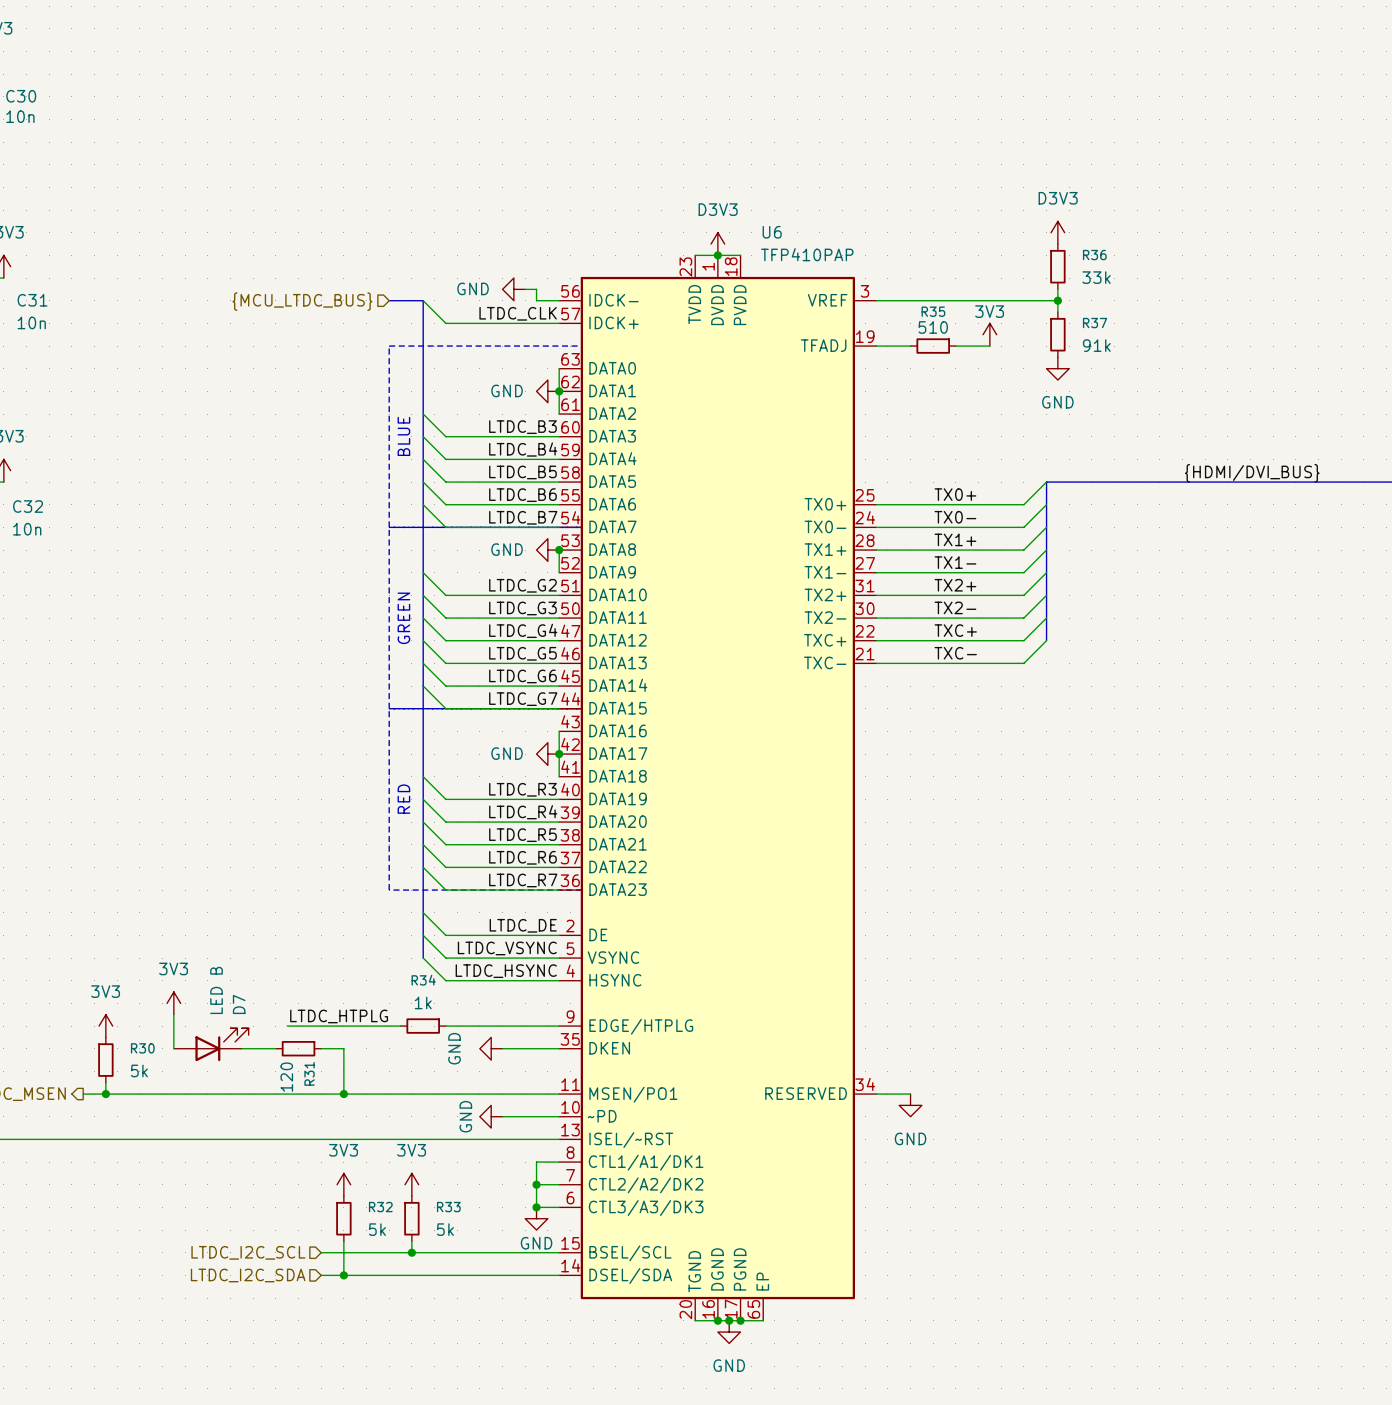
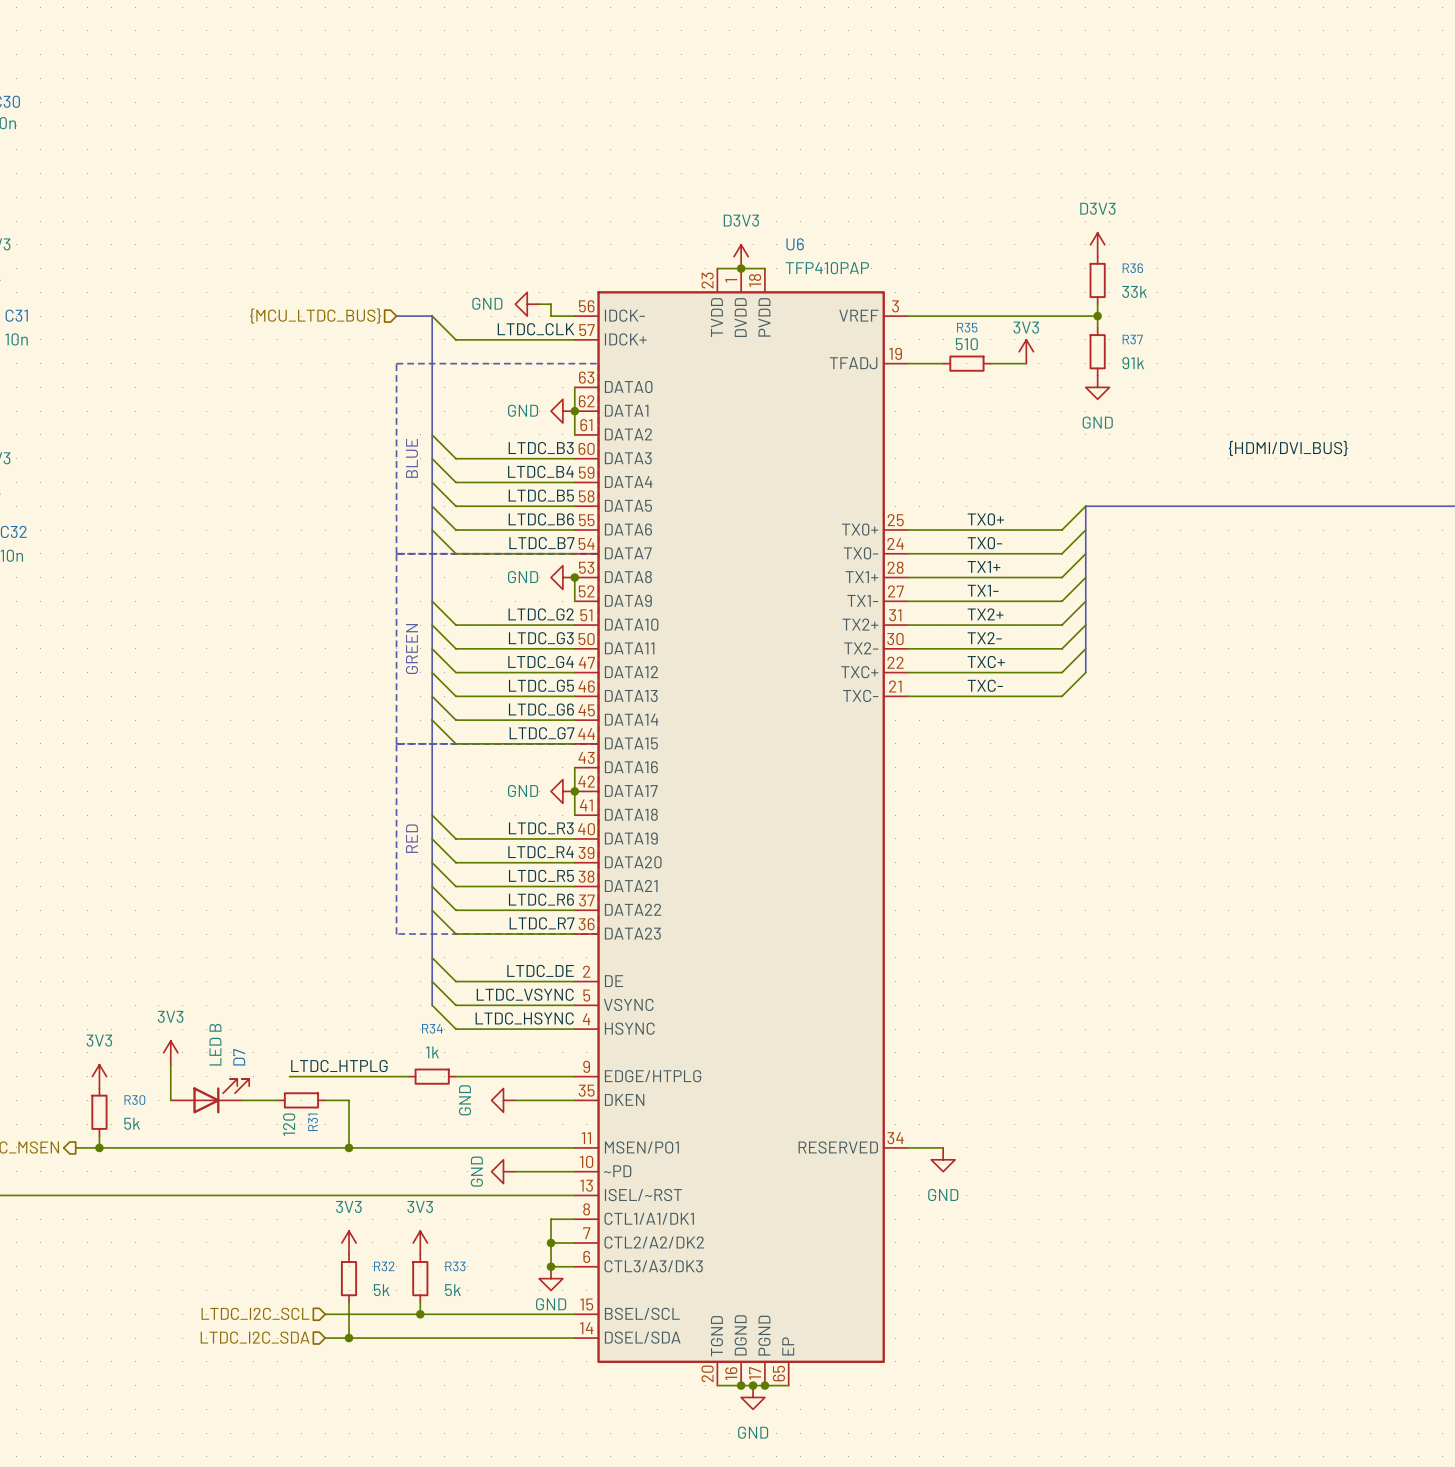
label position: {HDMI/DVI_BUS} (1252, 473) -> {HDMI/DVI_BUS} (1288, 448)

